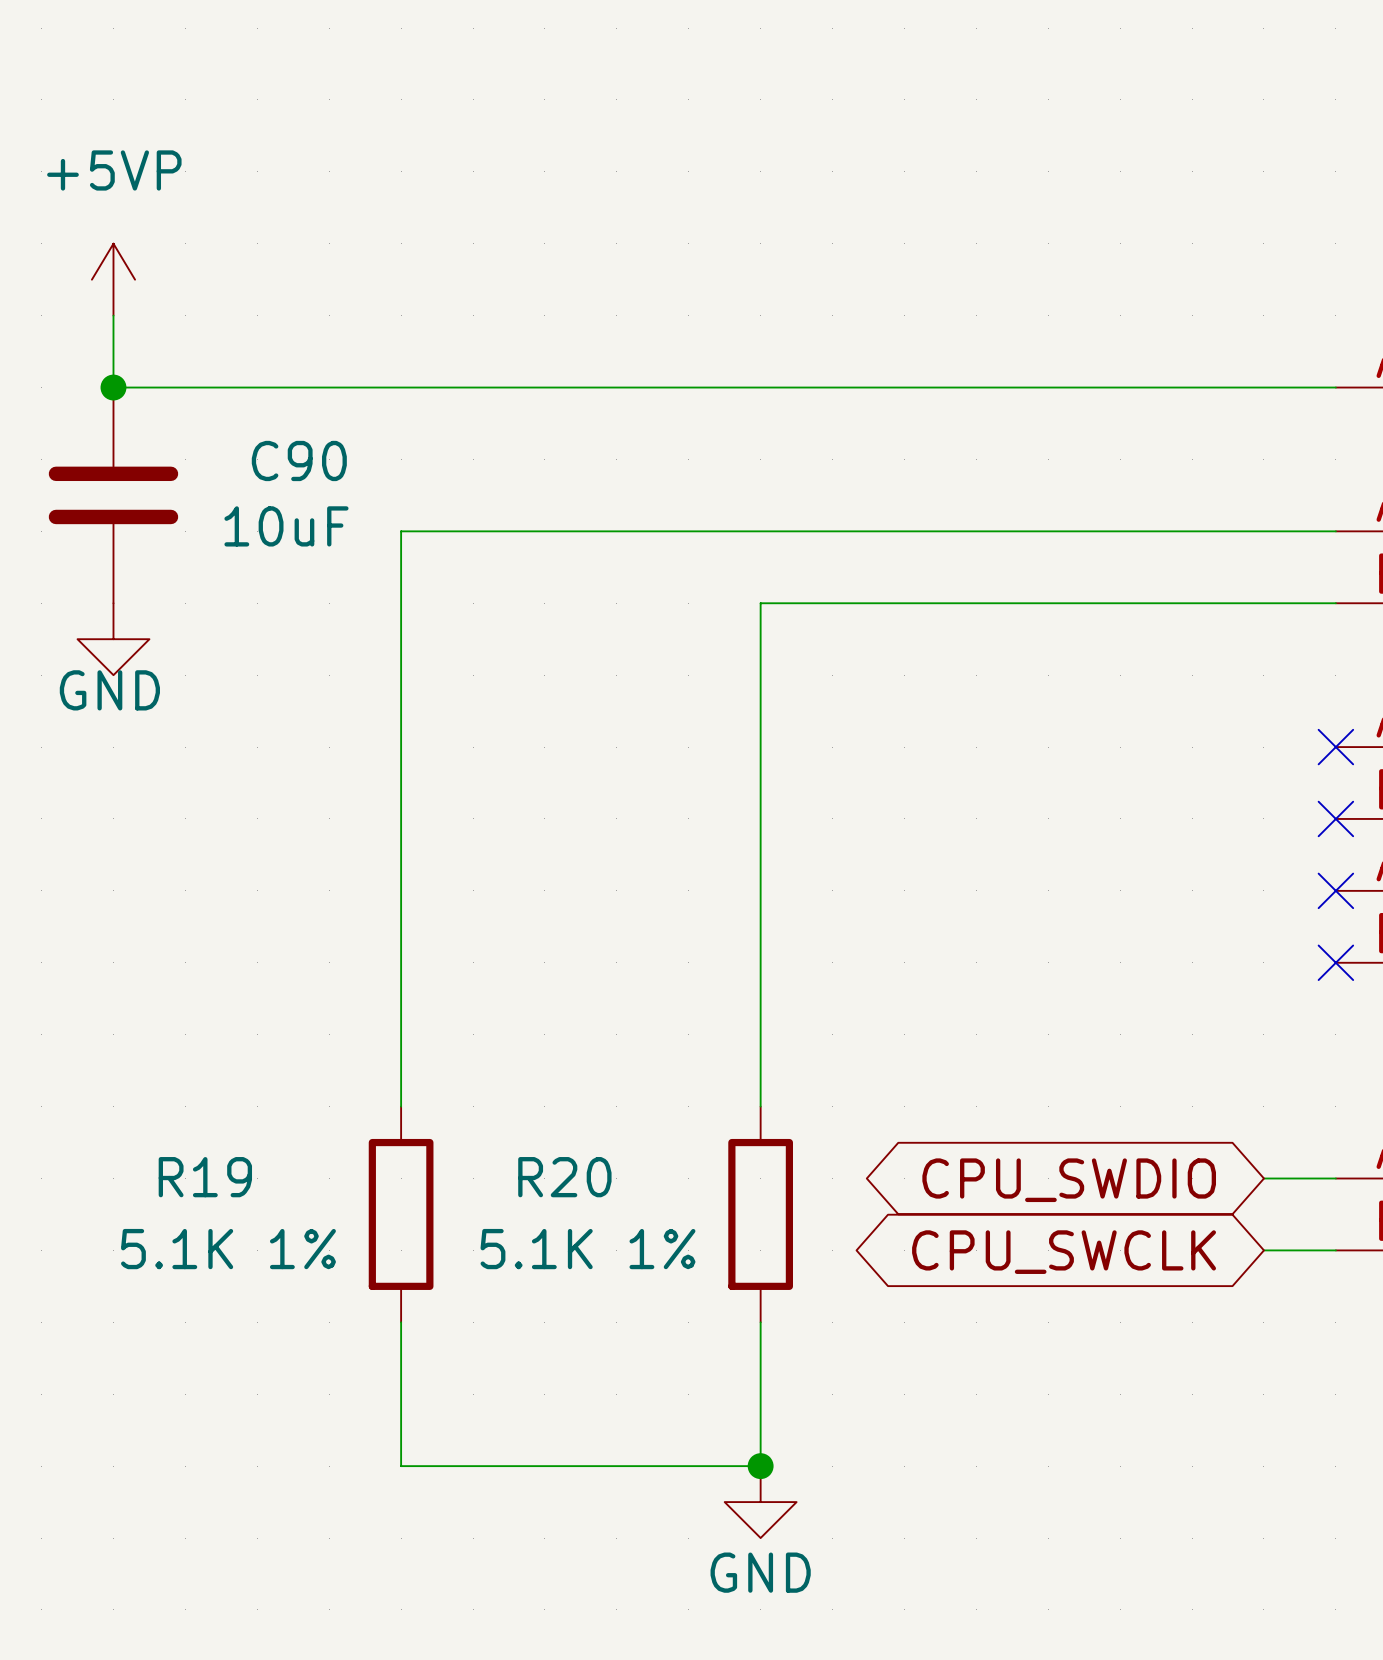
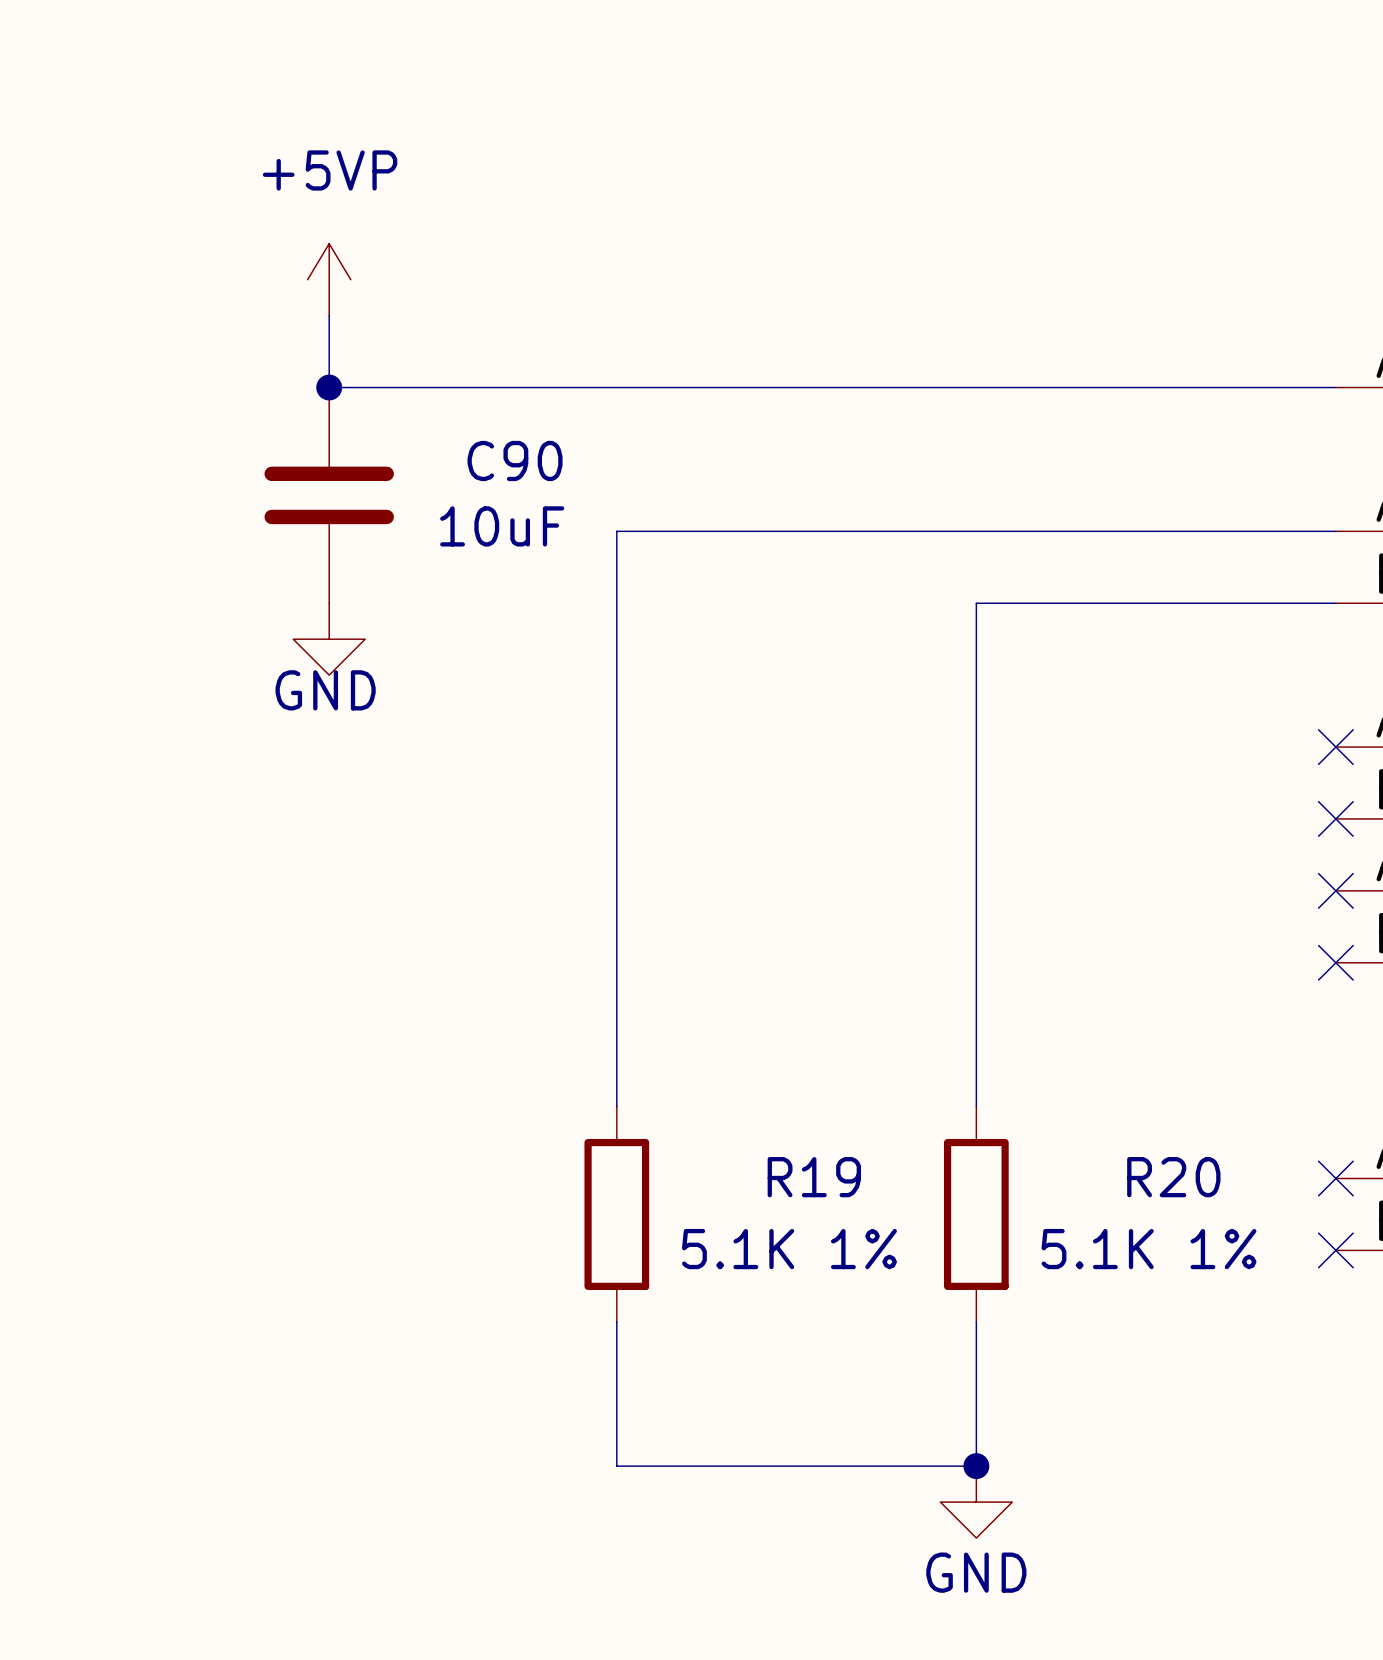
power symbol position: +5VP (113, 279) -> +5VP (329, 279)
wire: (113, 315) (113, 387) (329, 387) -> (329, 315) (329, 387)
junction: (113, 387) -> none
junction: none -> (329, 387)
C90 position: (113, 495) -> (329, 495)
wire: (616, 531) (401, 531) (401, 1106) -> (616, 531) (616, 1106)
wire: (976, 603) (760, 603) (760, 1106) -> (976, 603) (976, 1106)
power symbol position: GND (113, 639) -> GND (329, 639)
R19 name position: R19 (205, 1177) -> R19 (814, 1177)
R20 name position: R20 (564, 1177) -> R20 (1173, 1177)
wire: (1263, 1178) (1335, 1178) -> none
no-connect mark: none -> (1335, 1178)
global label: CPU_SWDIO (1069, 1180) -> none
R19 position: (401, 1214) -> (616, 1214)
R20 position: (760, 1214) -> (976, 1214)
R19 value position: 5.1K 1% (228, 1249) -> 5.1K 1% (789, 1249)
R20 value position: 5.1K 1% (587, 1249) -> 5.1K 1% (1149, 1249)
wire: (1263, 1250) (1335, 1250) -> none
no-connect mark: none -> (1335, 1250)
global label: CPU_SWCLK (1064, 1252) -> none
wire: (401, 1322) (401, 1466) (616, 1466) -> (616, 1322) (616, 1466)
wire: (760, 1322) (760, 1466) -> (976, 1322) (976, 1466) (760, 1466)
junction: (760, 1466) -> none
junction: none -> (976, 1466)
power symbol position: GND (760, 1502) -> GND (976, 1502)

